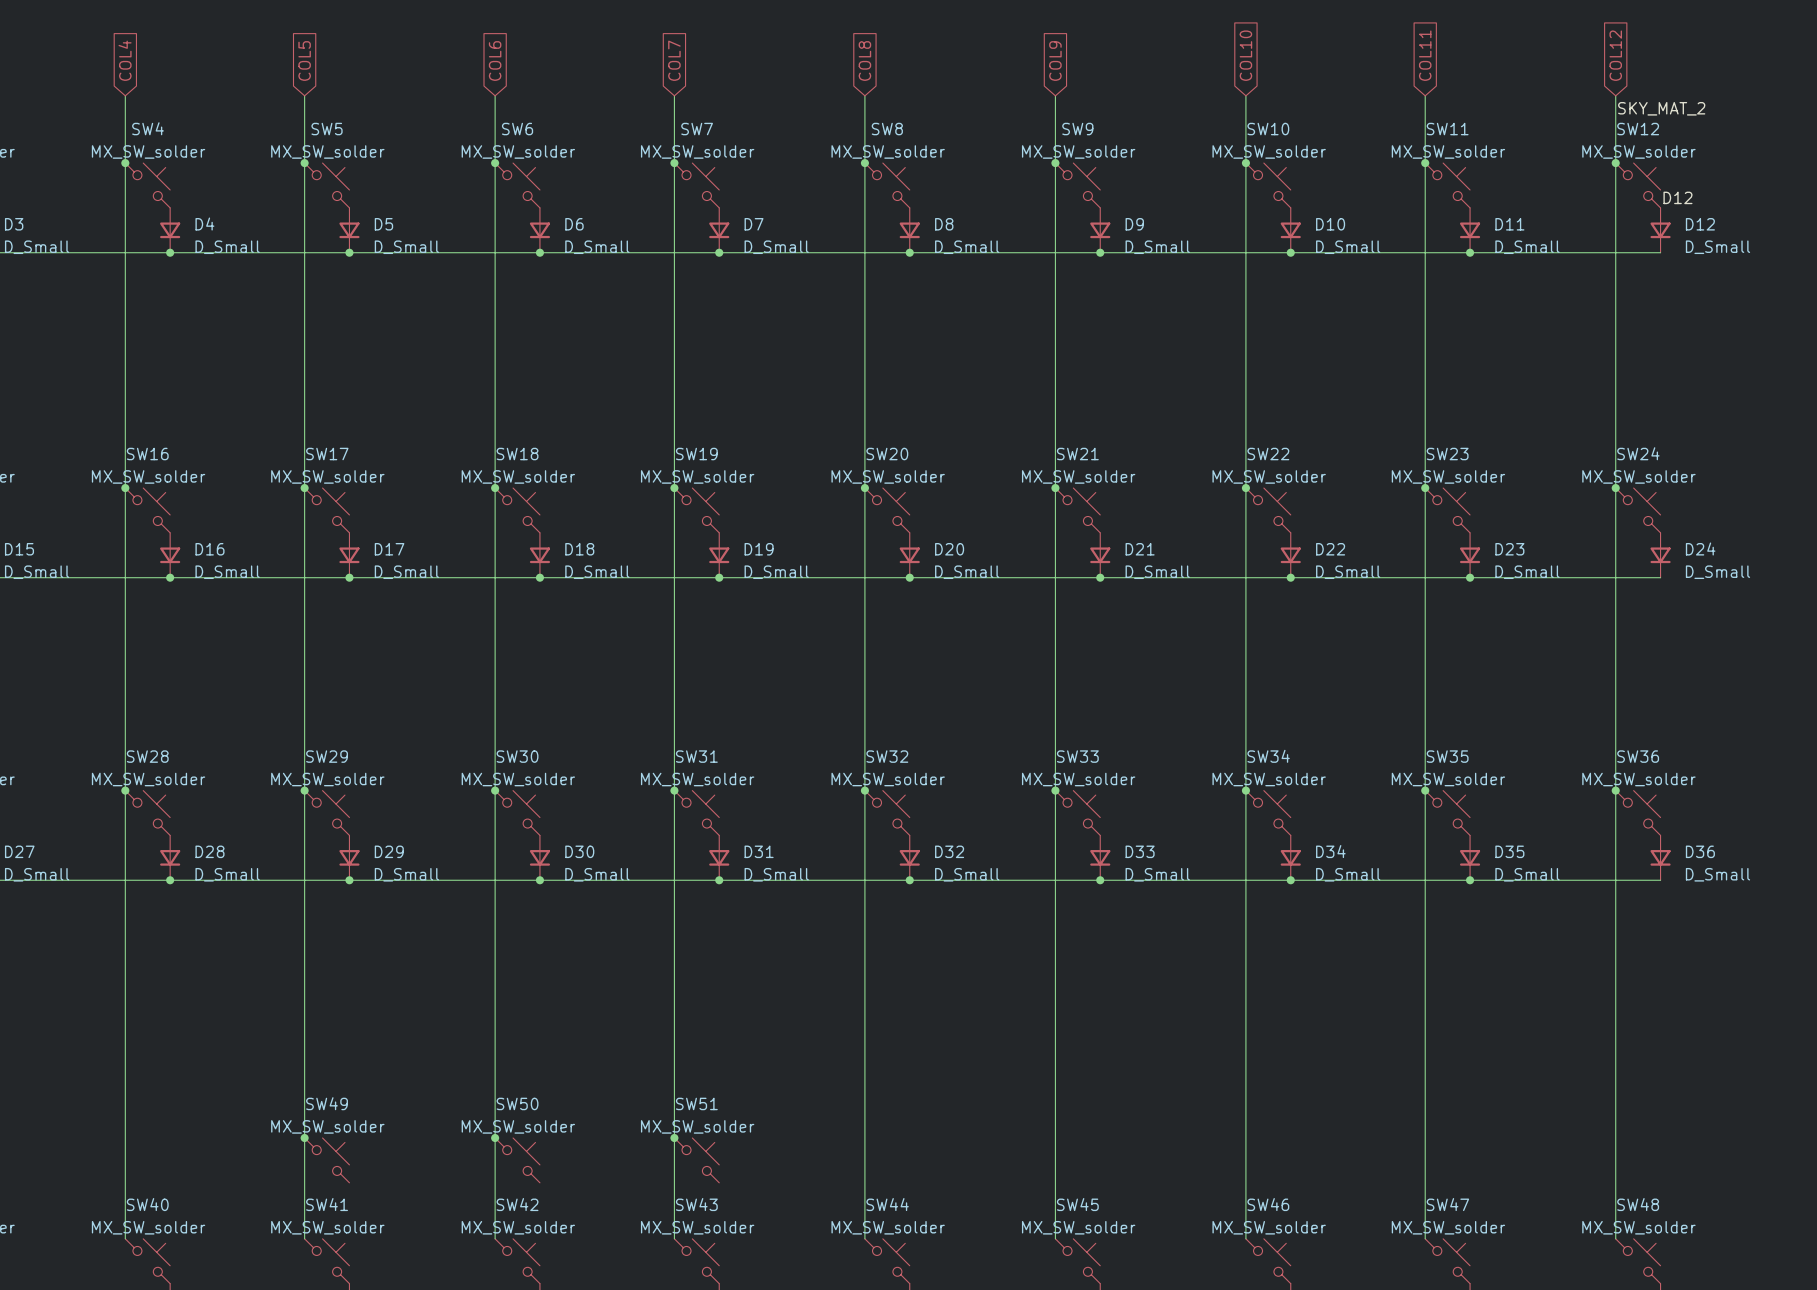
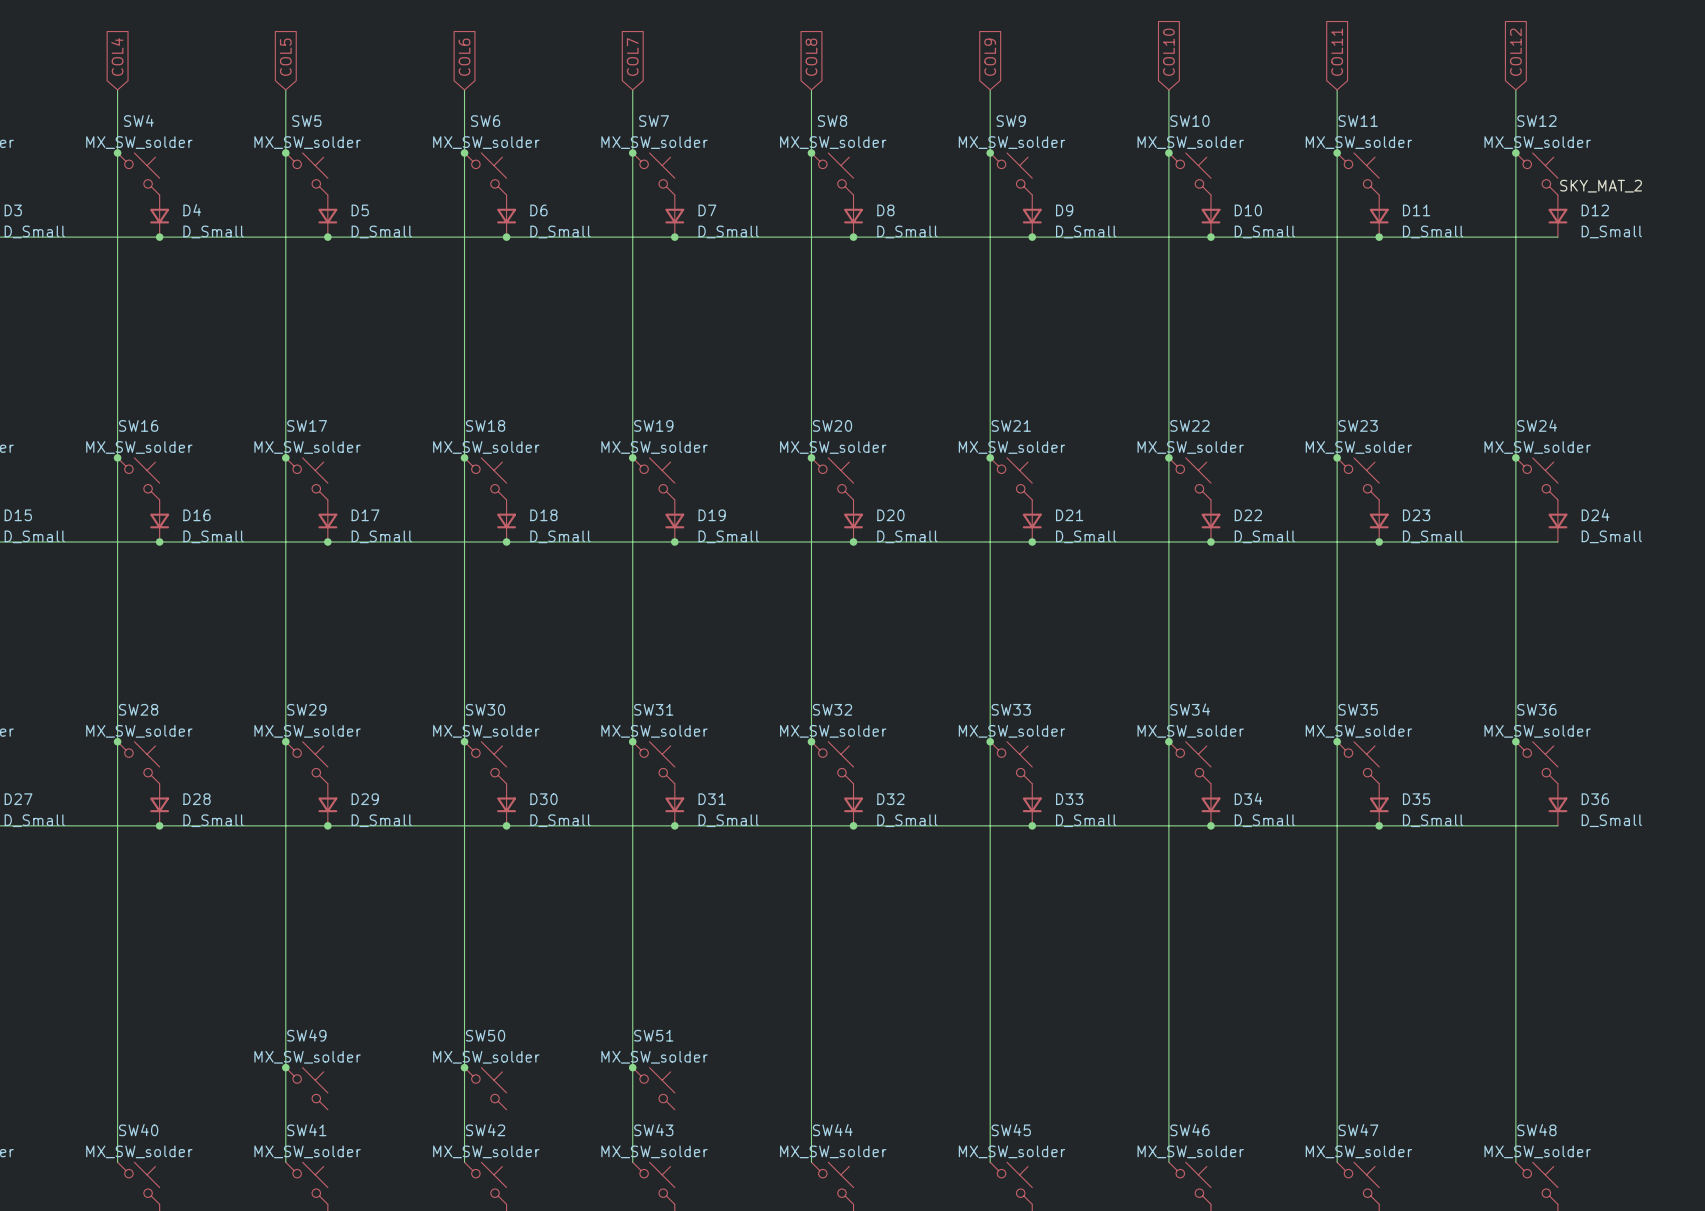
label: SKY_MAT_2 (1661, 108) -> none
label: D12 (1677, 197) -> SKY_MAT_2 (1601, 186)

